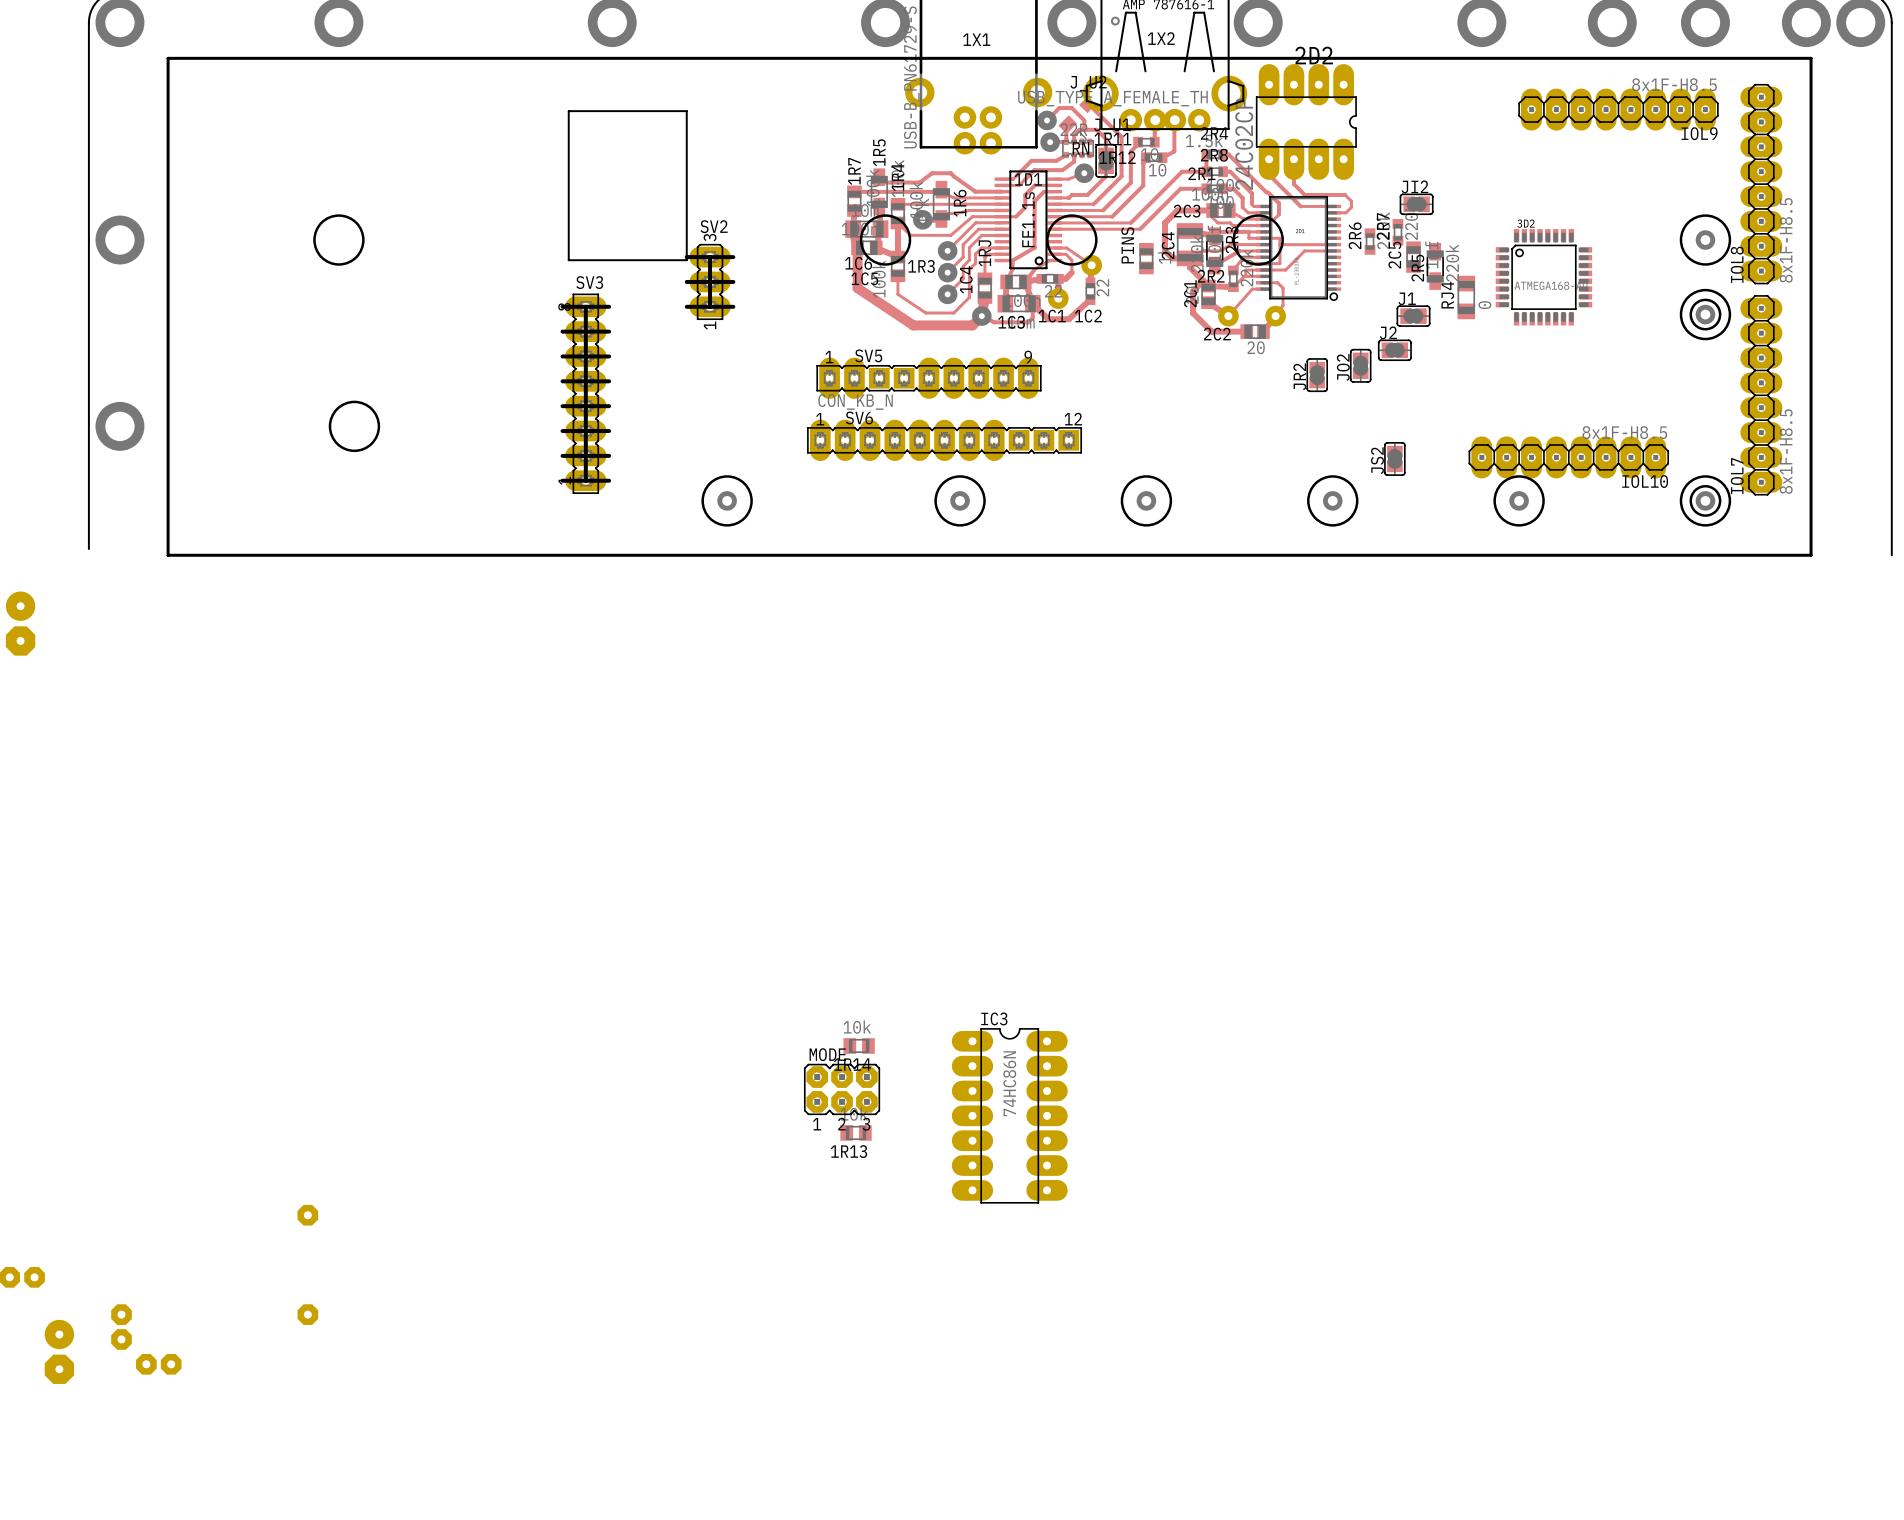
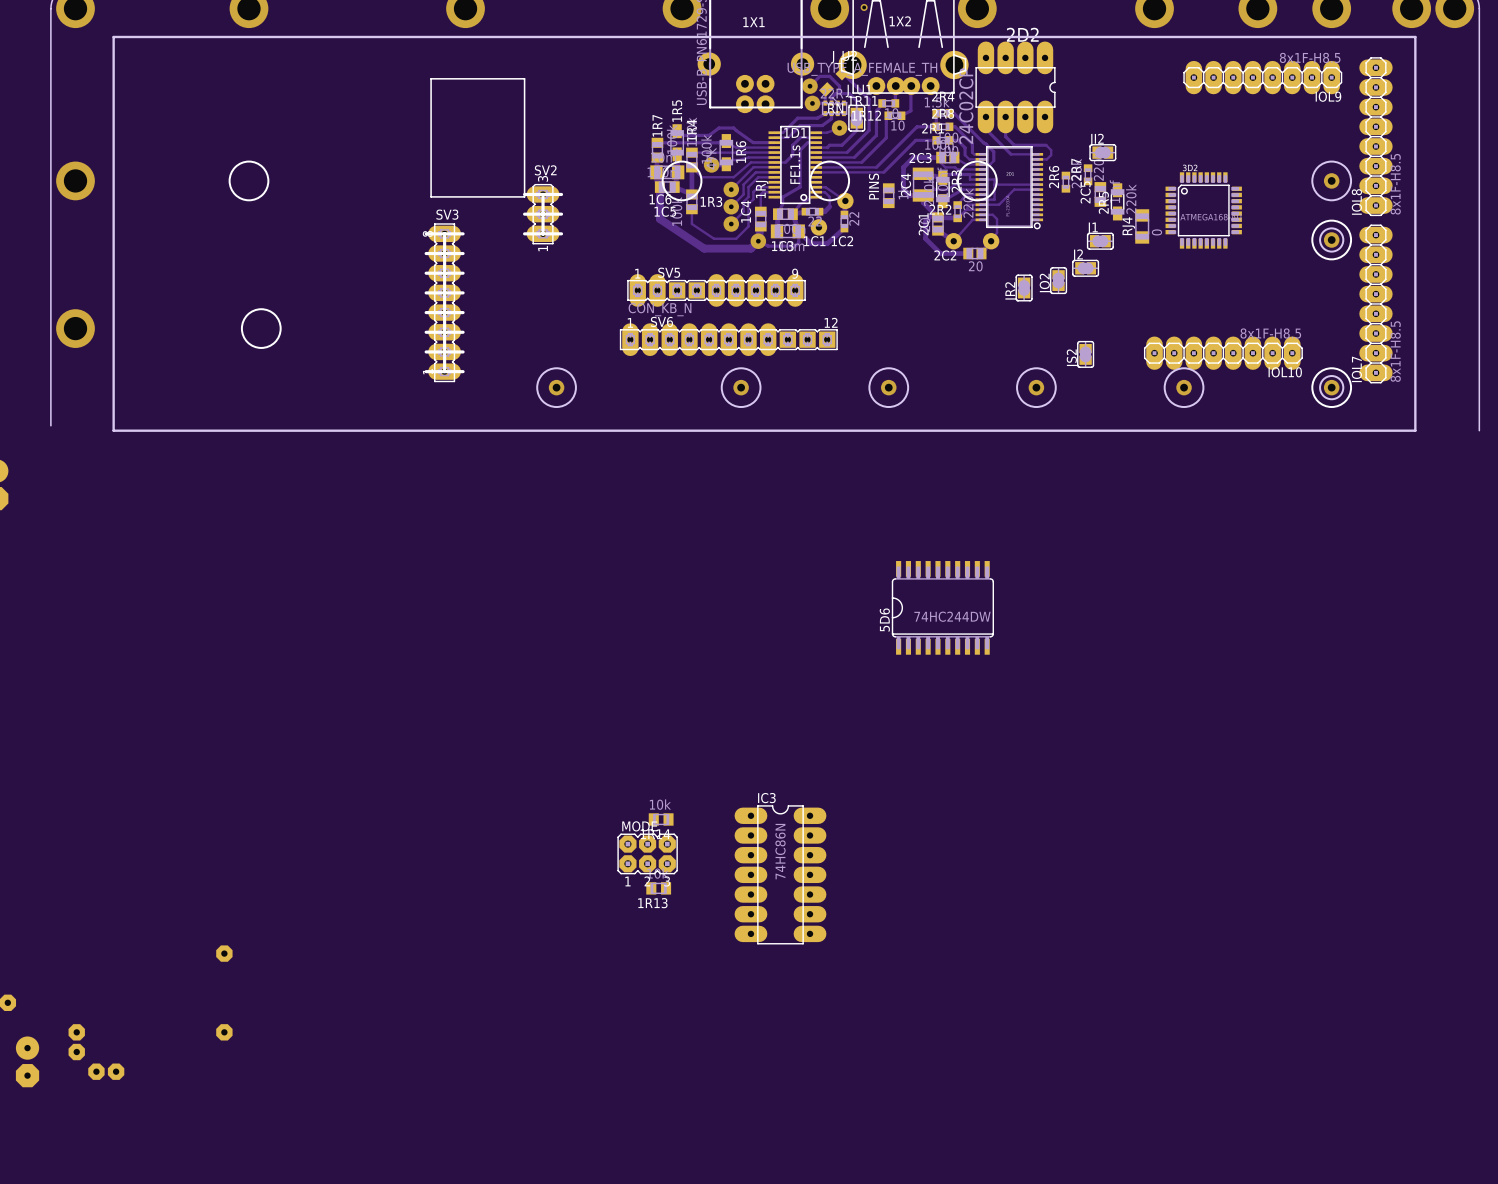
5D6: none -> 74HC244DW (942, 607)

